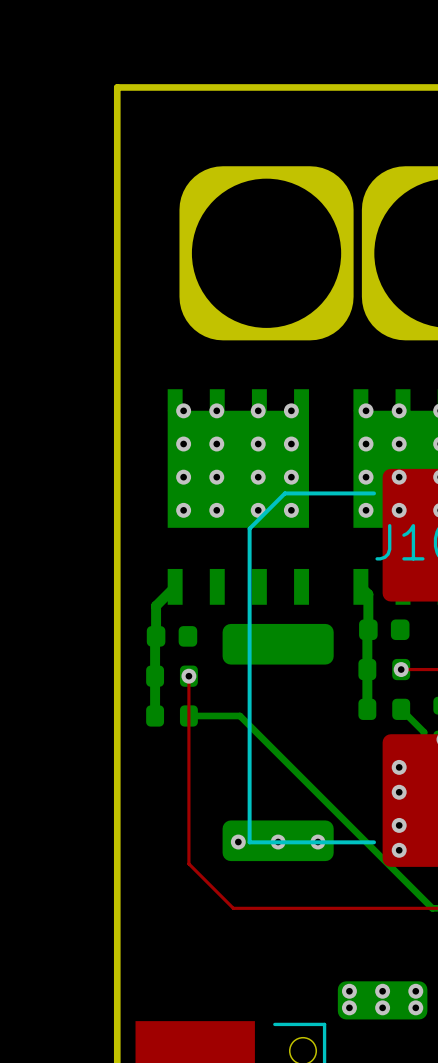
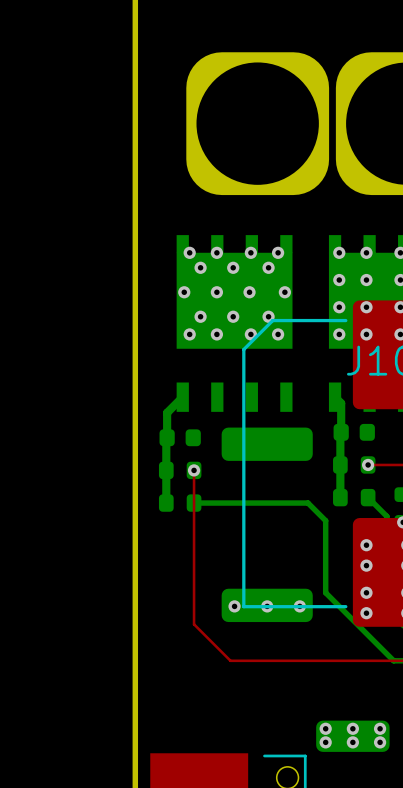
via: none -> (200, 267)
via: none -> (233, 267)
via: none -> (268, 267)
via: (183, 444) -> none
via: (216, 444) -> none
via: (258, 444) -> none
via: (291, 444) -> none
via: none -> (184, 292)
via: none -> (216, 292)
via: none -> (249, 292)
via: none -> (284, 292)
via position: (183, 477) -> (200, 316)
via: (216, 477) -> none
via: (258, 477) -> none
via position: (291, 477) -> (268, 316)
via: none -> (233, 316)
bottom track: (240, 715) (349, 825) -> (235, 503) (308, 503) (325, 520) (325, 592)

